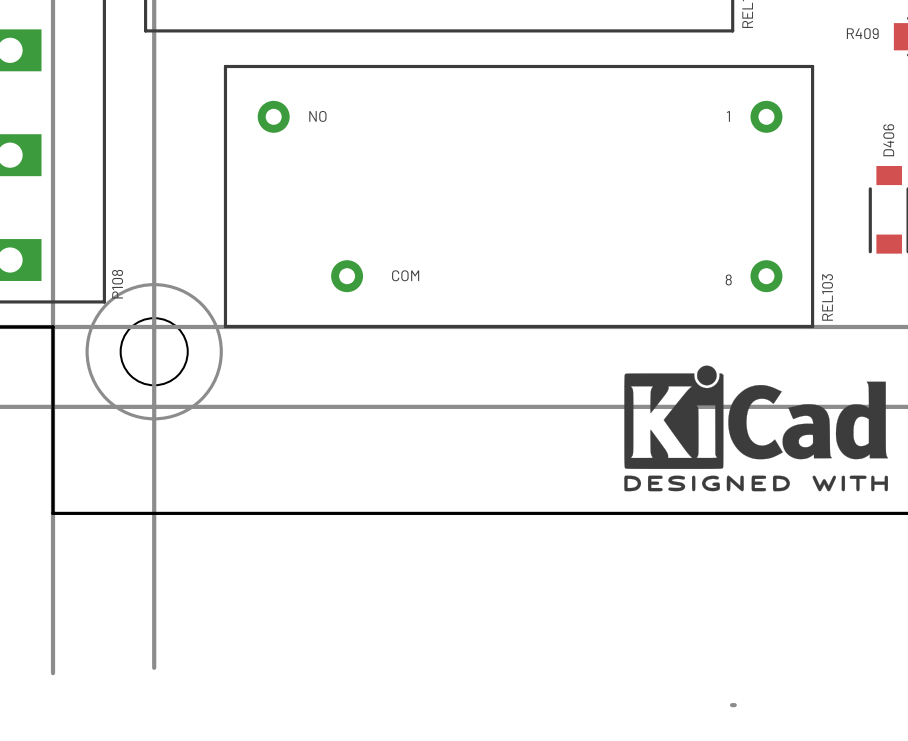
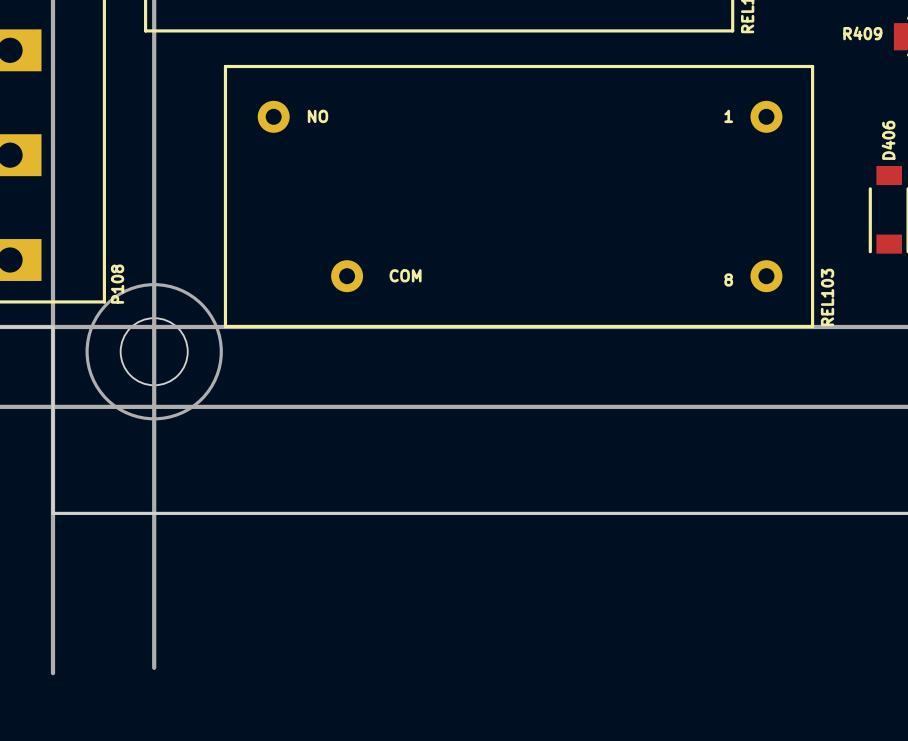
drawing: [624, 365, 888, 492] -> none
line: (732, 705) (734, 705) -> none

